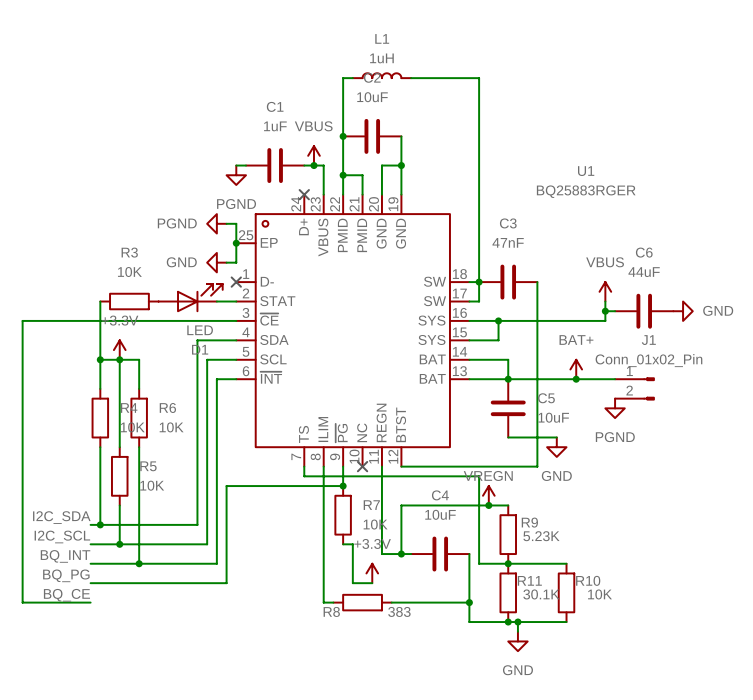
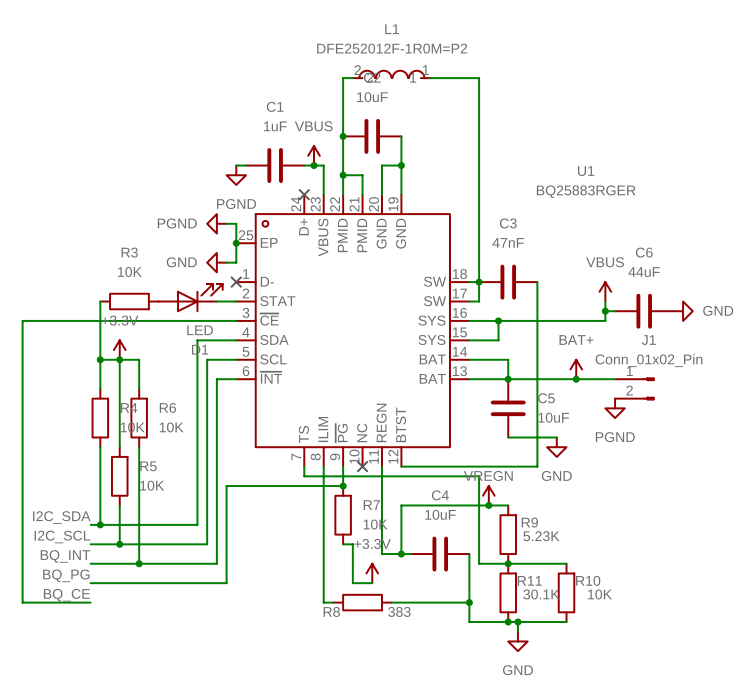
L1 value: 1uH (381, 58) -> DFE252012F-1R0M=P2 (392, 48)
L1 symbol: [352, 73, 412, 79] -> [352, 70, 431, 79]

